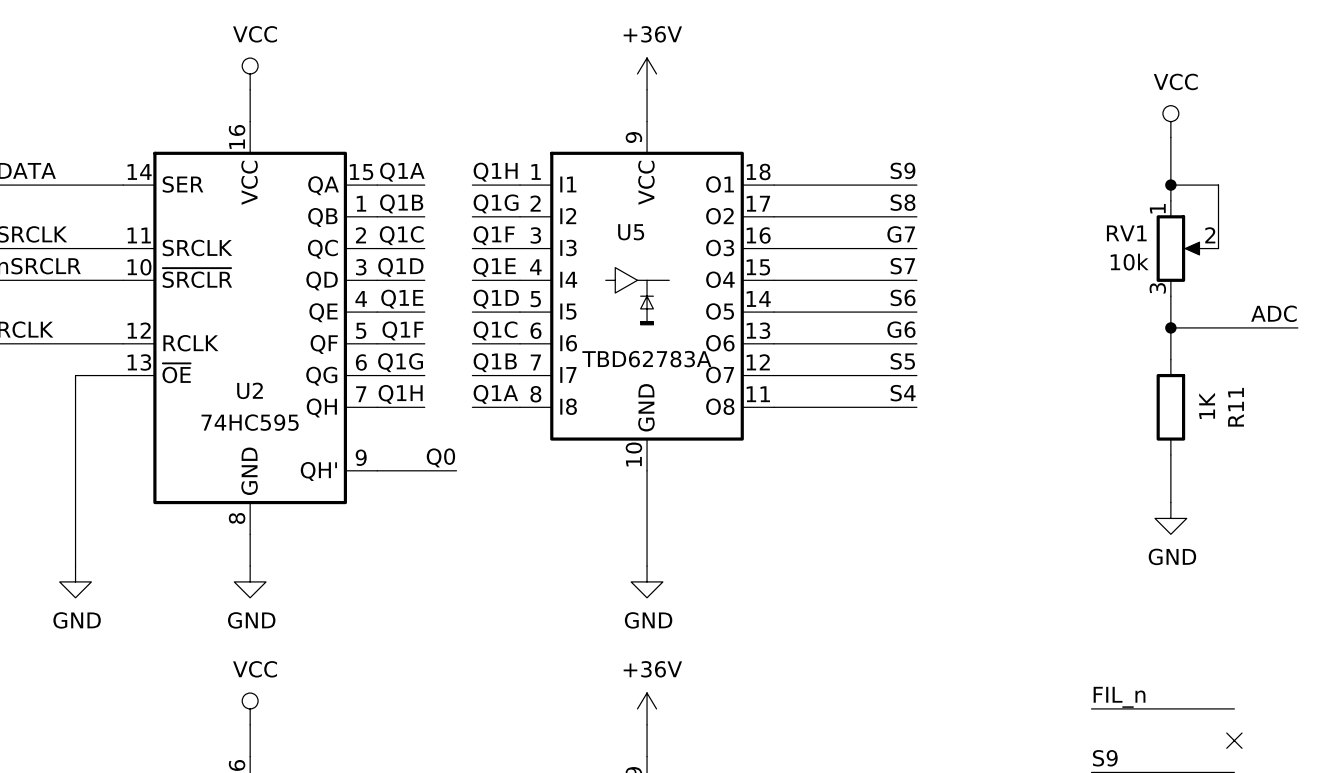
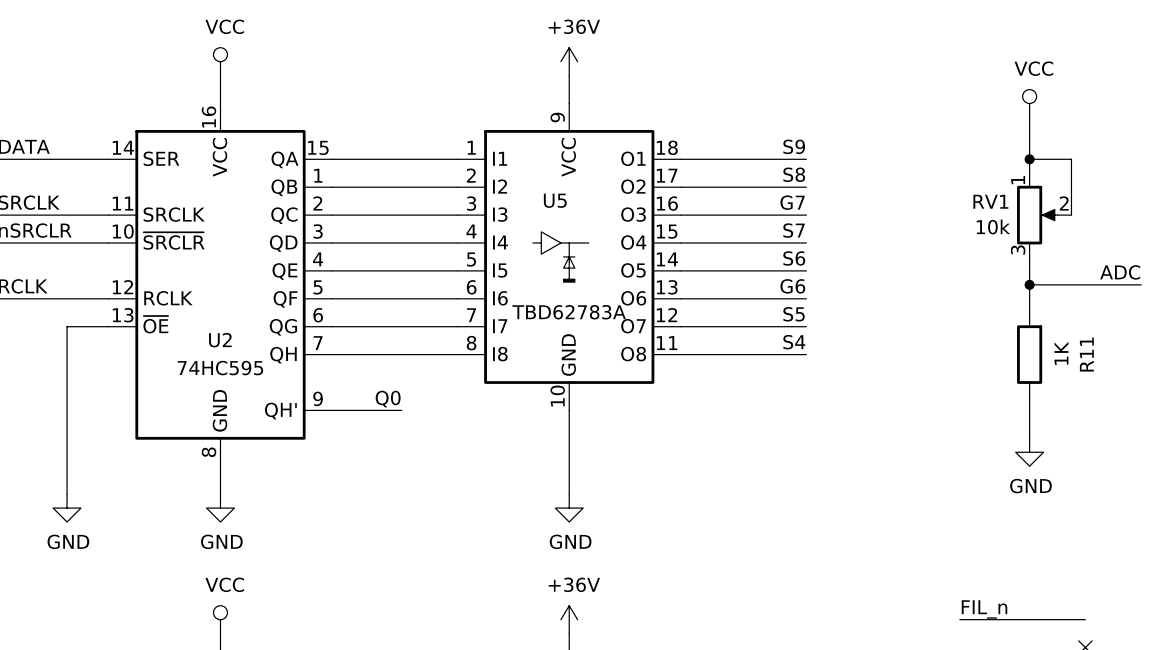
label: Q1A (402, 172) -> none
label: Q1H (495, 172) -> none
wire: none -> (373, 159) (415, 159)
label: Q1B (401, 203) -> none
label: Q1G (496, 203) -> none
wire: none -> (373, 187) (415, 187)
label: Q1C (401, 235) -> none
label: Q1F (494, 235) -> none
wire: none -> (373, 215) (415, 215)
label: Q1D (400, 267) -> none
label: Q1E (494, 267) -> none
wire: none -> (373, 243) (415, 243)
label: Q1E (402, 299) -> none
label: Q1D (496, 299) -> none
wire: none -> (373, 270) (415, 270)
label: Q1F (403, 330) -> none
label: Q1C (495, 330) -> none
wire: none -> (373, 298) (415, 298)
label: Q1G (400, 362) -> none
label: Q1B (495, 362) -> none
wire: none -> (373, 326) (415, 326)
label: Q1H (400, 394) -> none
label: Q1A (495, 394) -> none
wire: none -> (373, 354) (415, 354)

